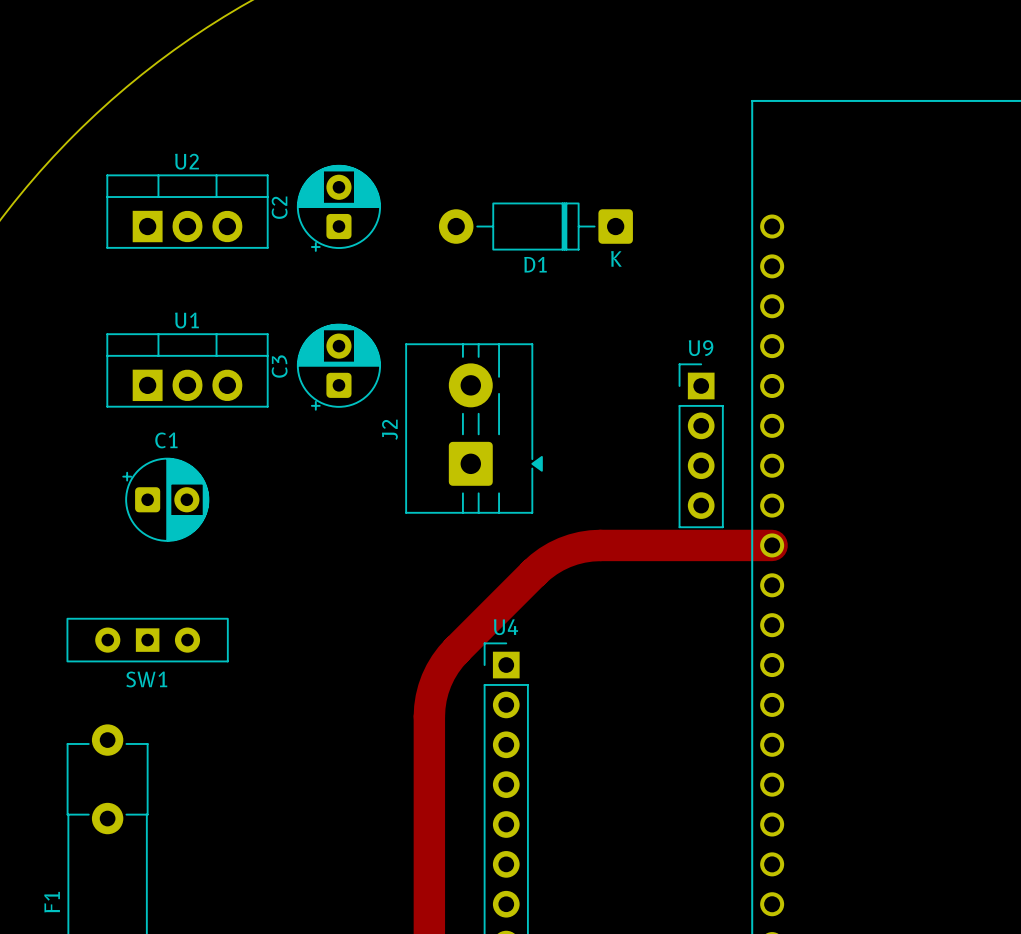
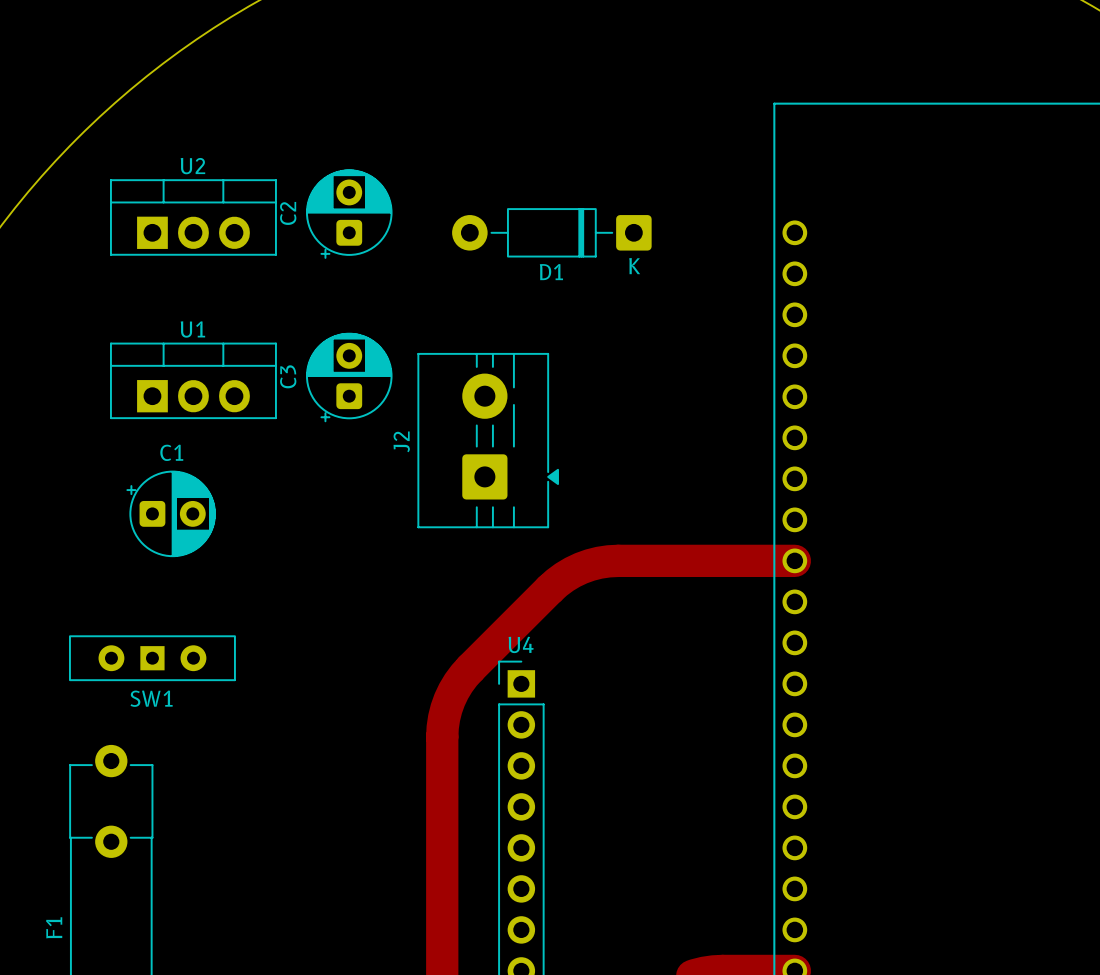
U9: (701, 445) -> none

